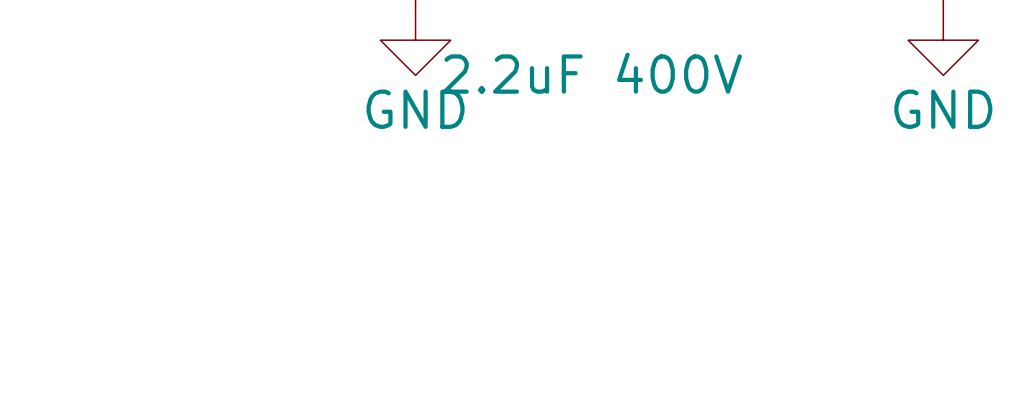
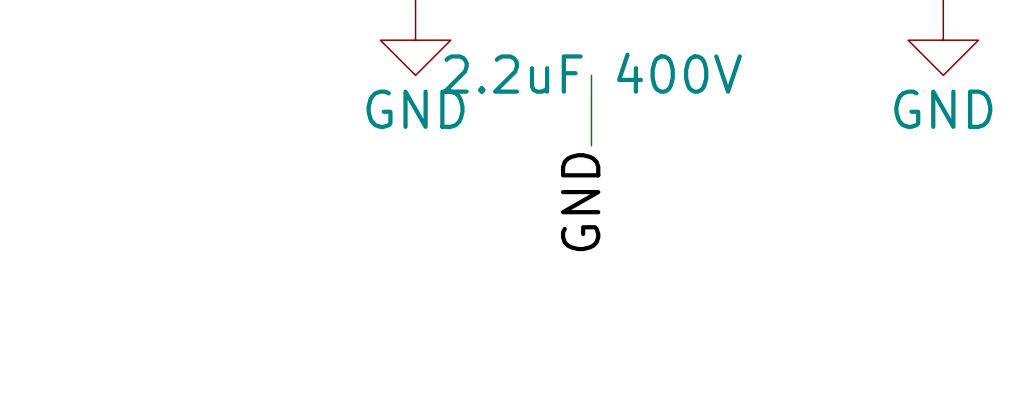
wire: none -> (591, 75) (591, 145)
label: none -> GND (580, 202)

